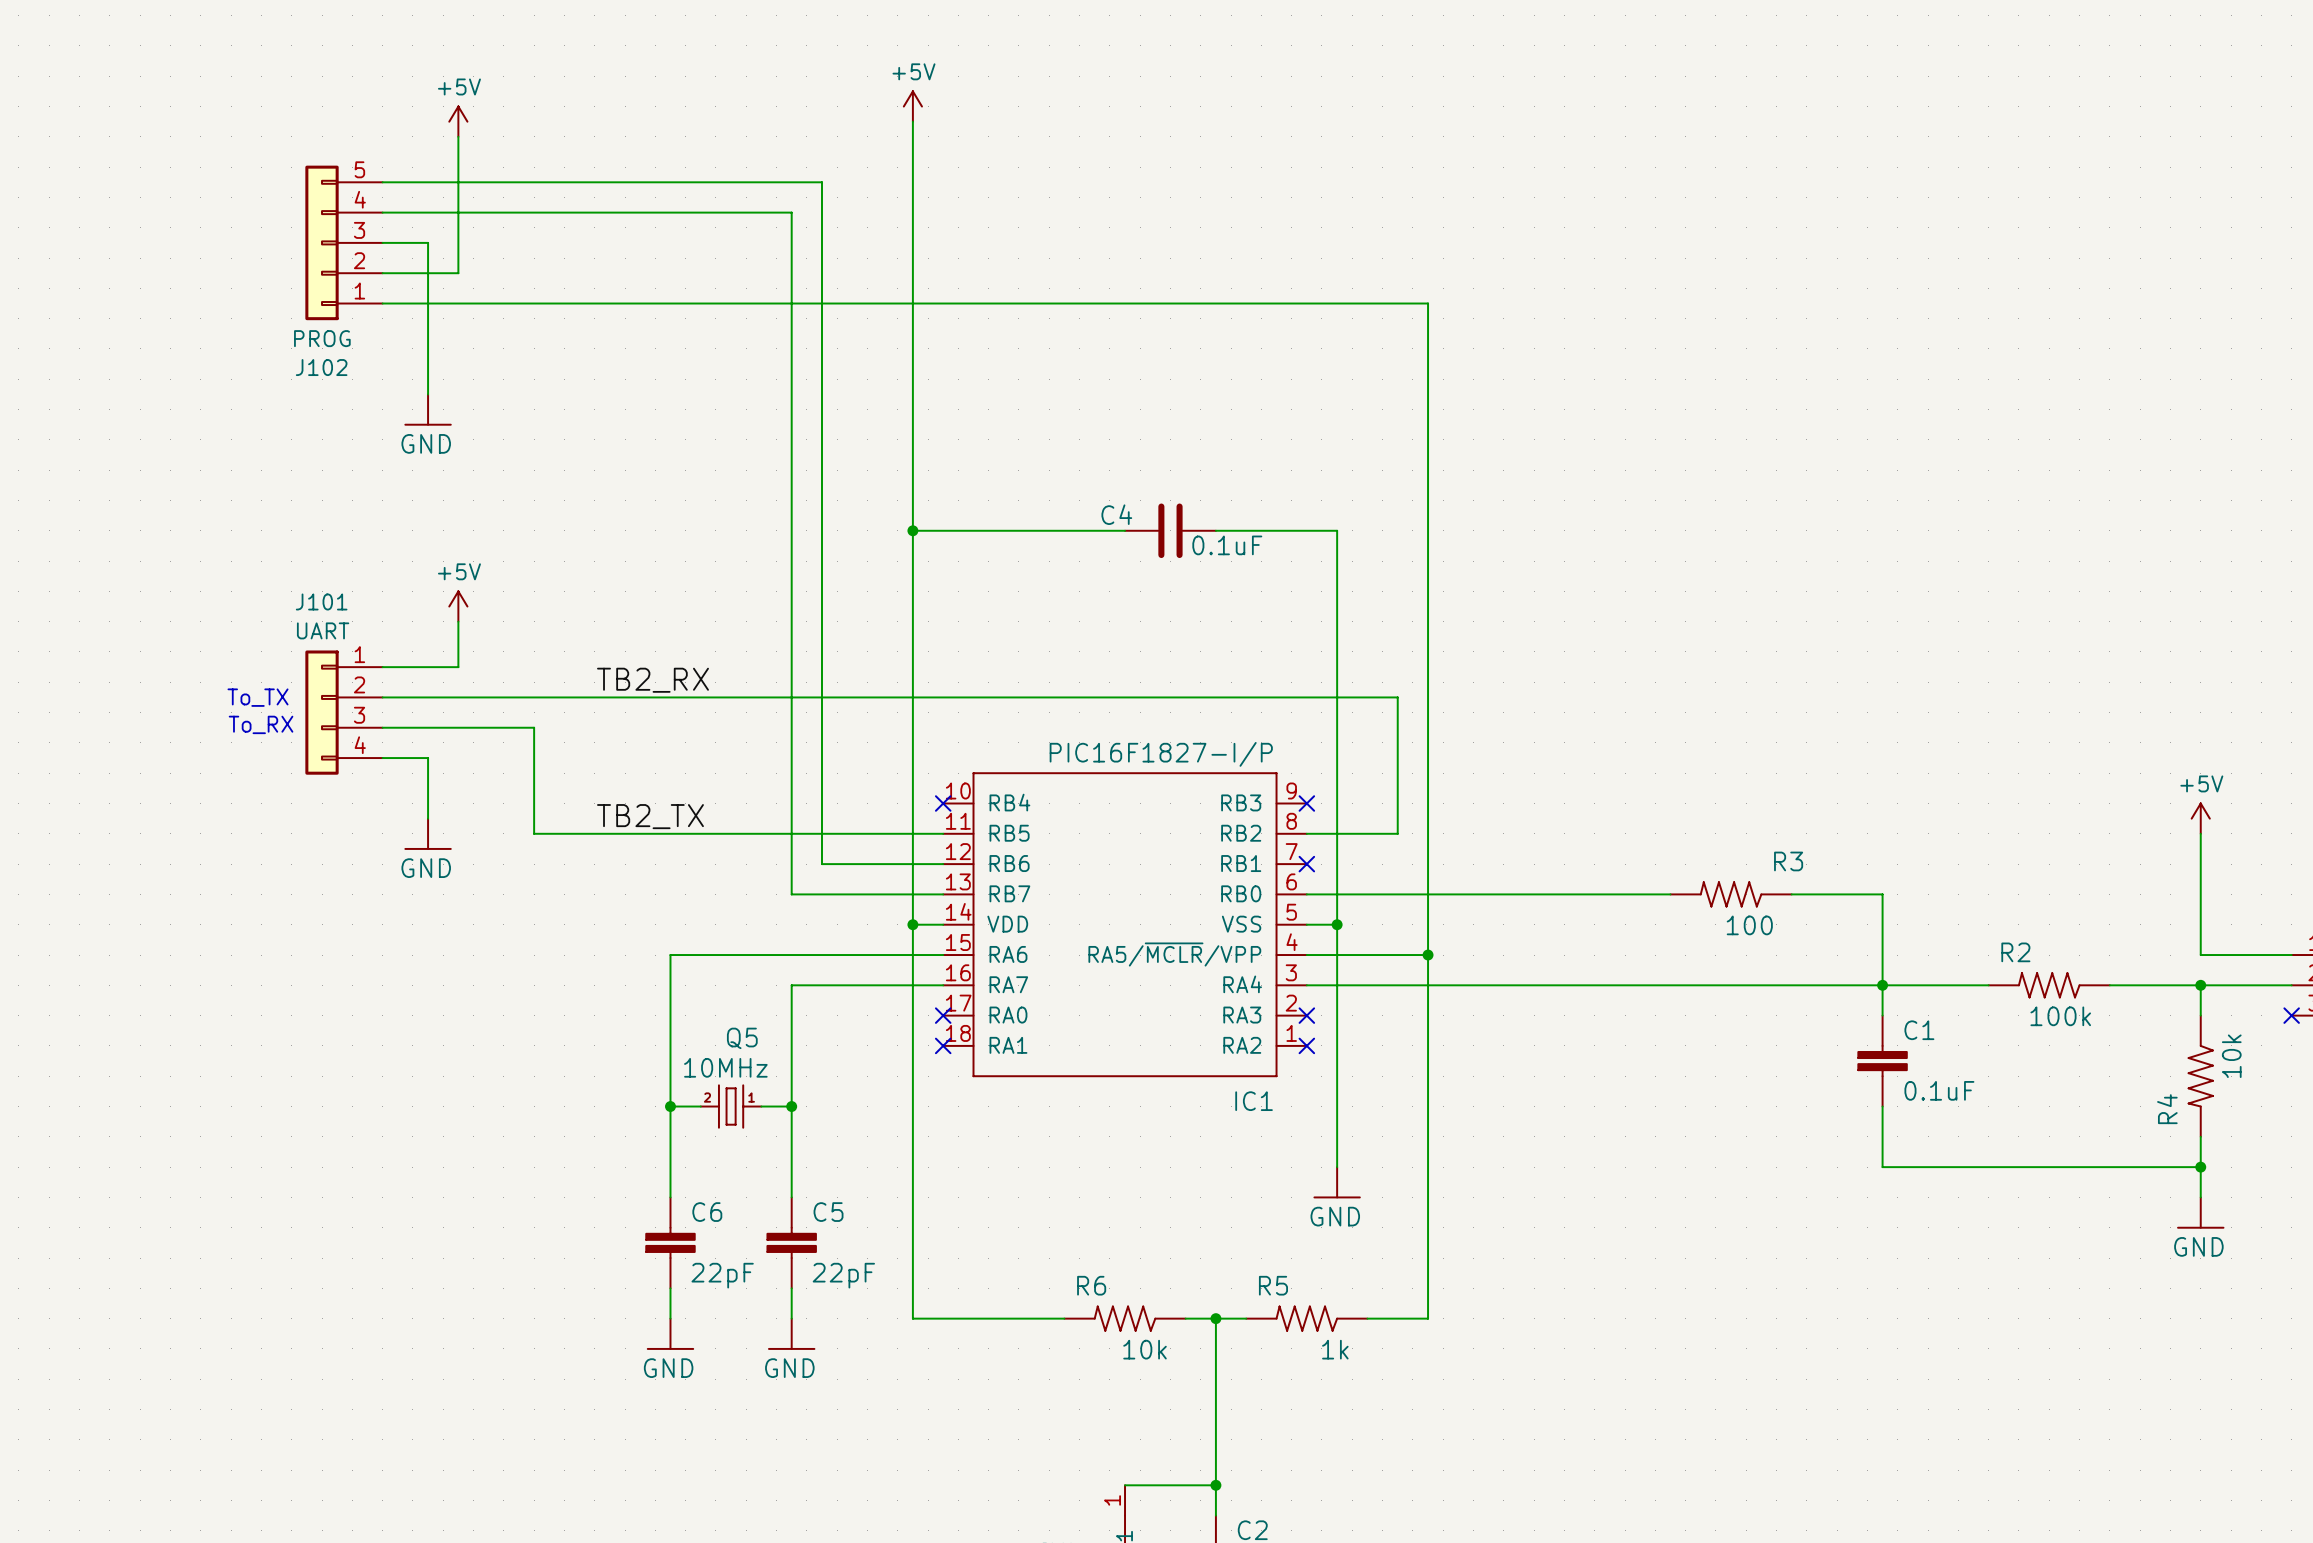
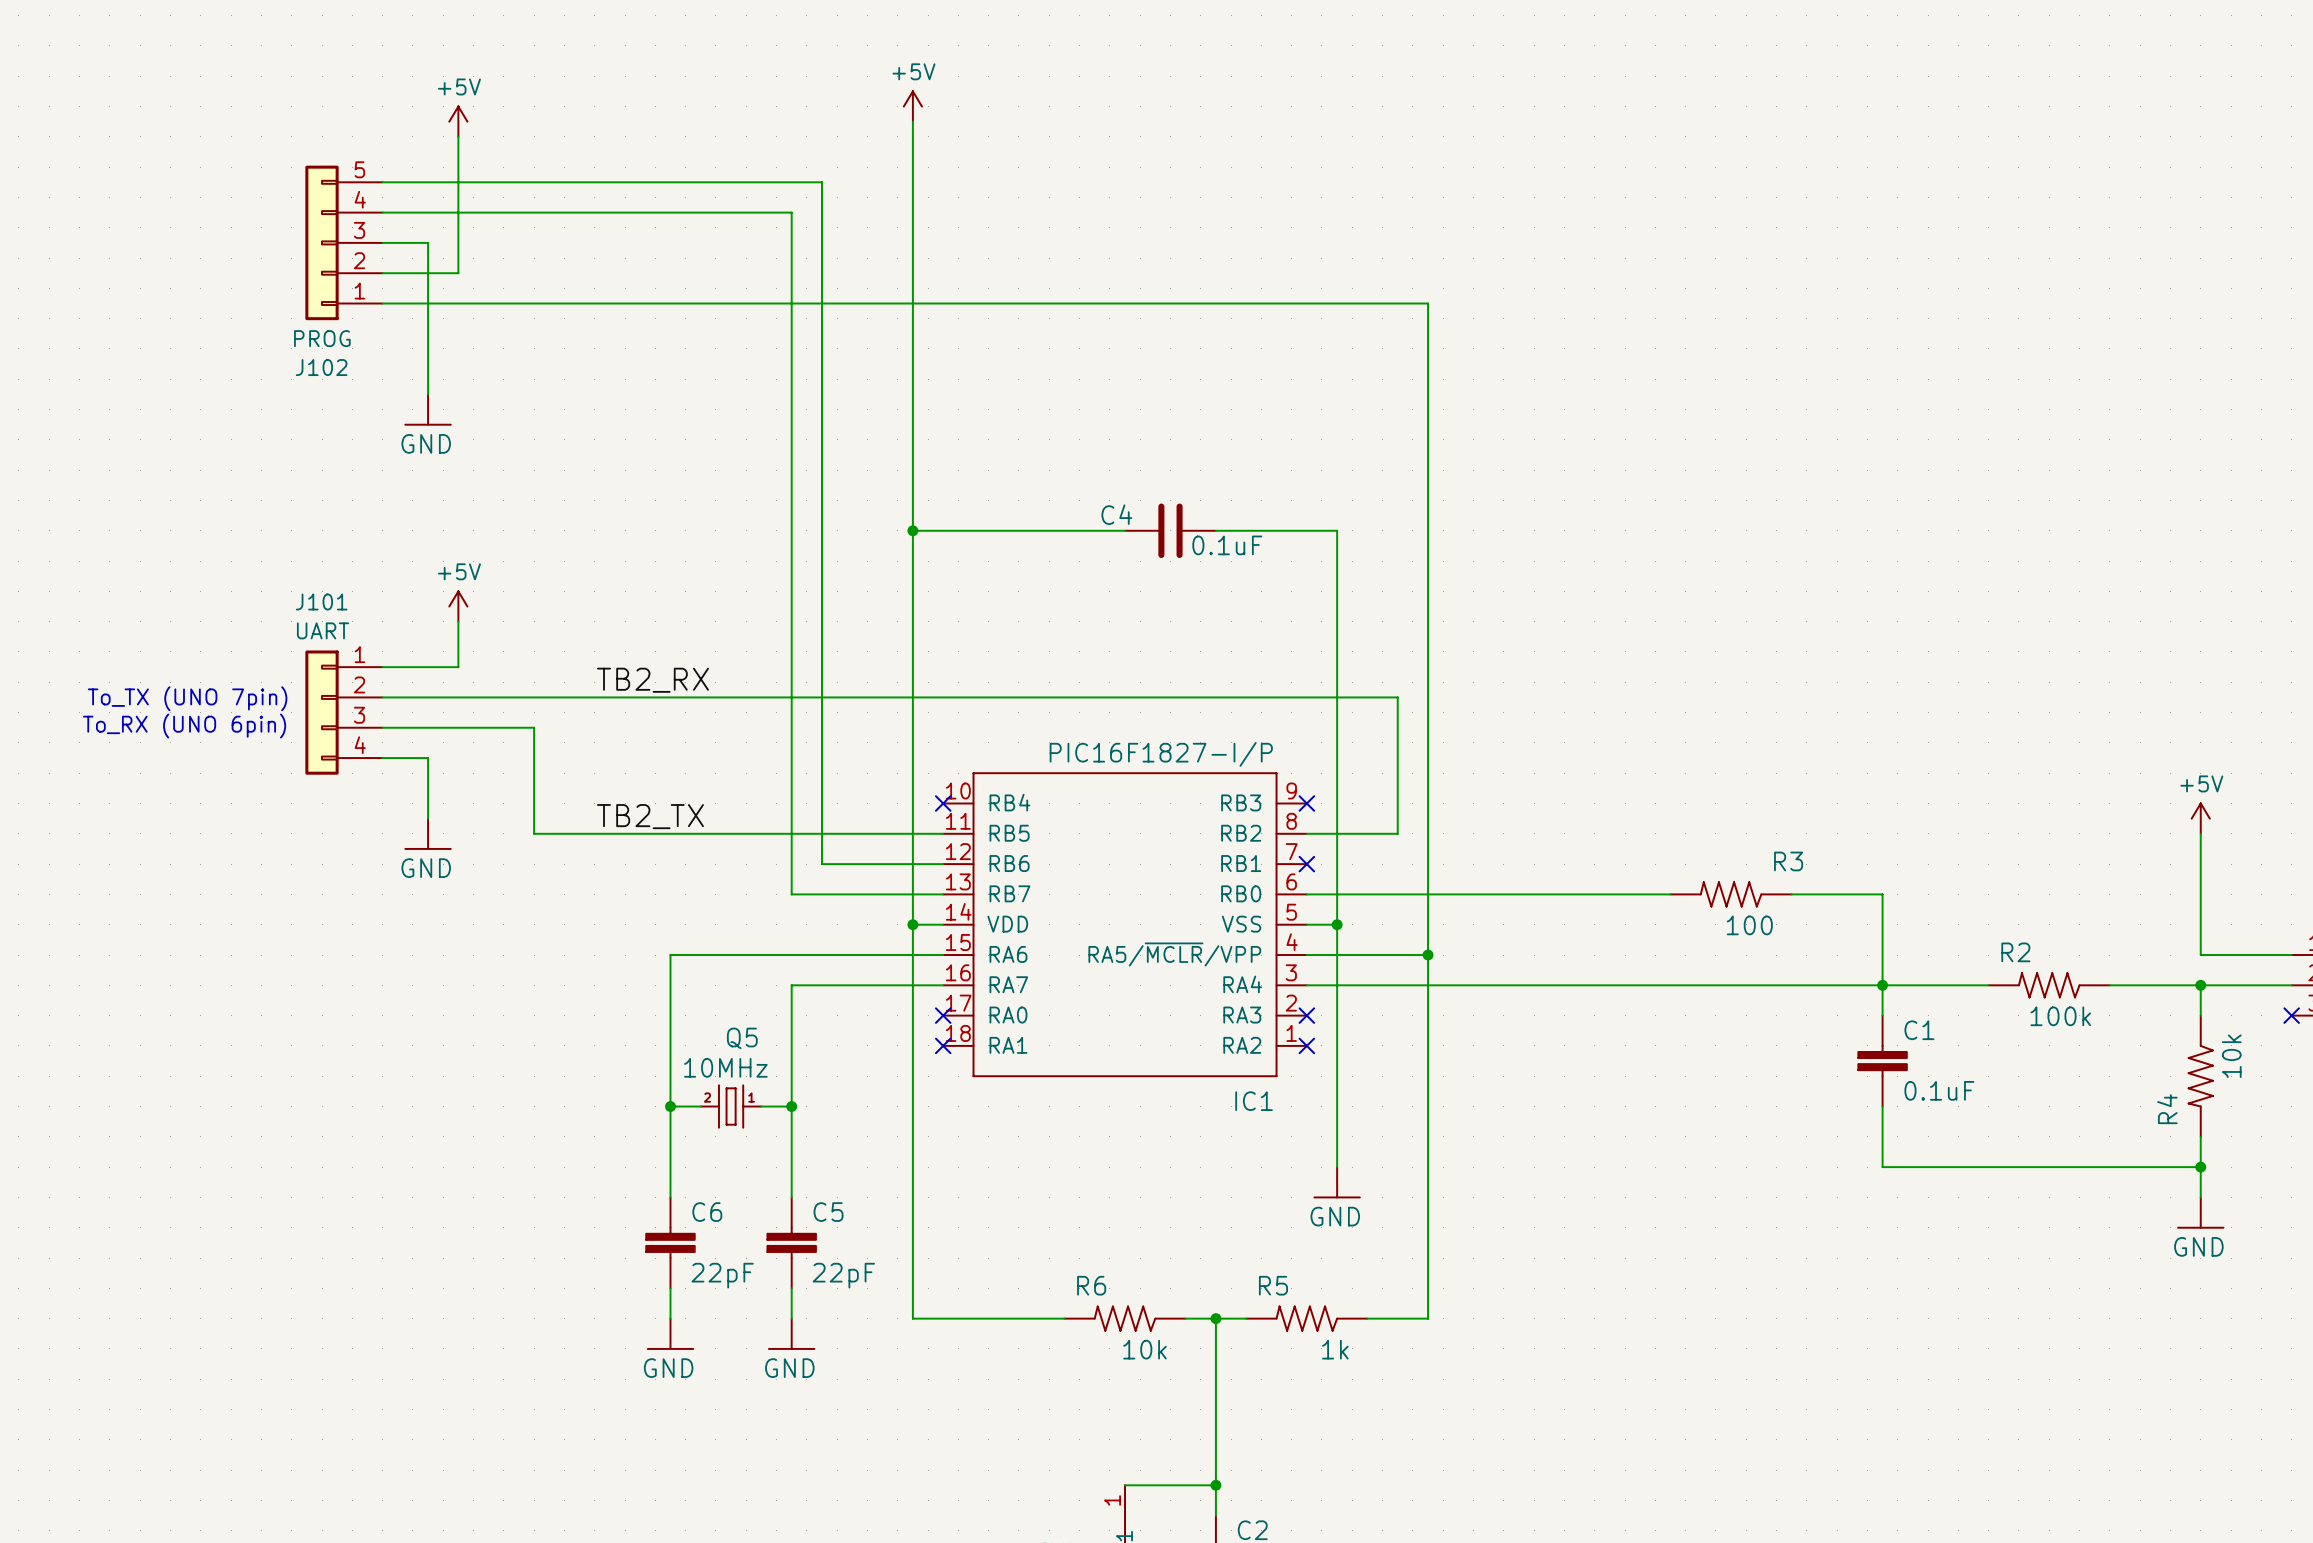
text: To_TX (258, 697) -> none
text: none -> To_TX (UNO 7pin) (187, 698)
text: To_RX (261, 724) -> none
text: none -> To_RX (UNO 6pin) (184, 726)

